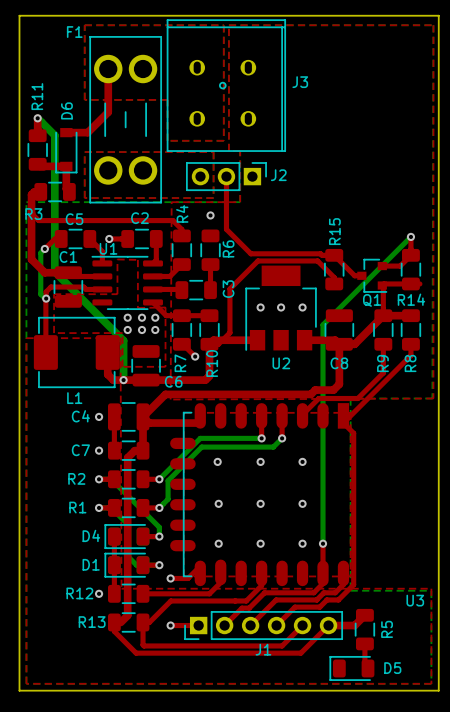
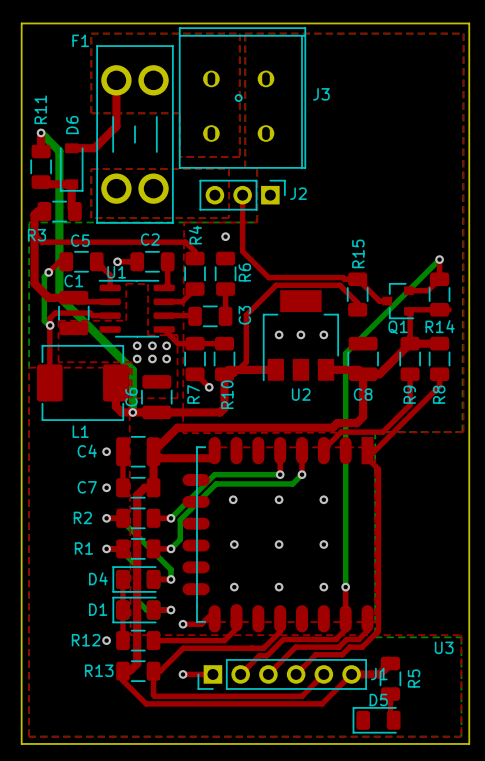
C6 name rotation: 0° (173, 381) -> 90° counterclockwise (131, 397)
C6 name position: C6 (173, 381) -> C6 (131, 397)
J1 name position: J1 (263, 649) -> J1 (379, 674)
D5 name position: D5 (392, 668) -> D5 (378, 700)

